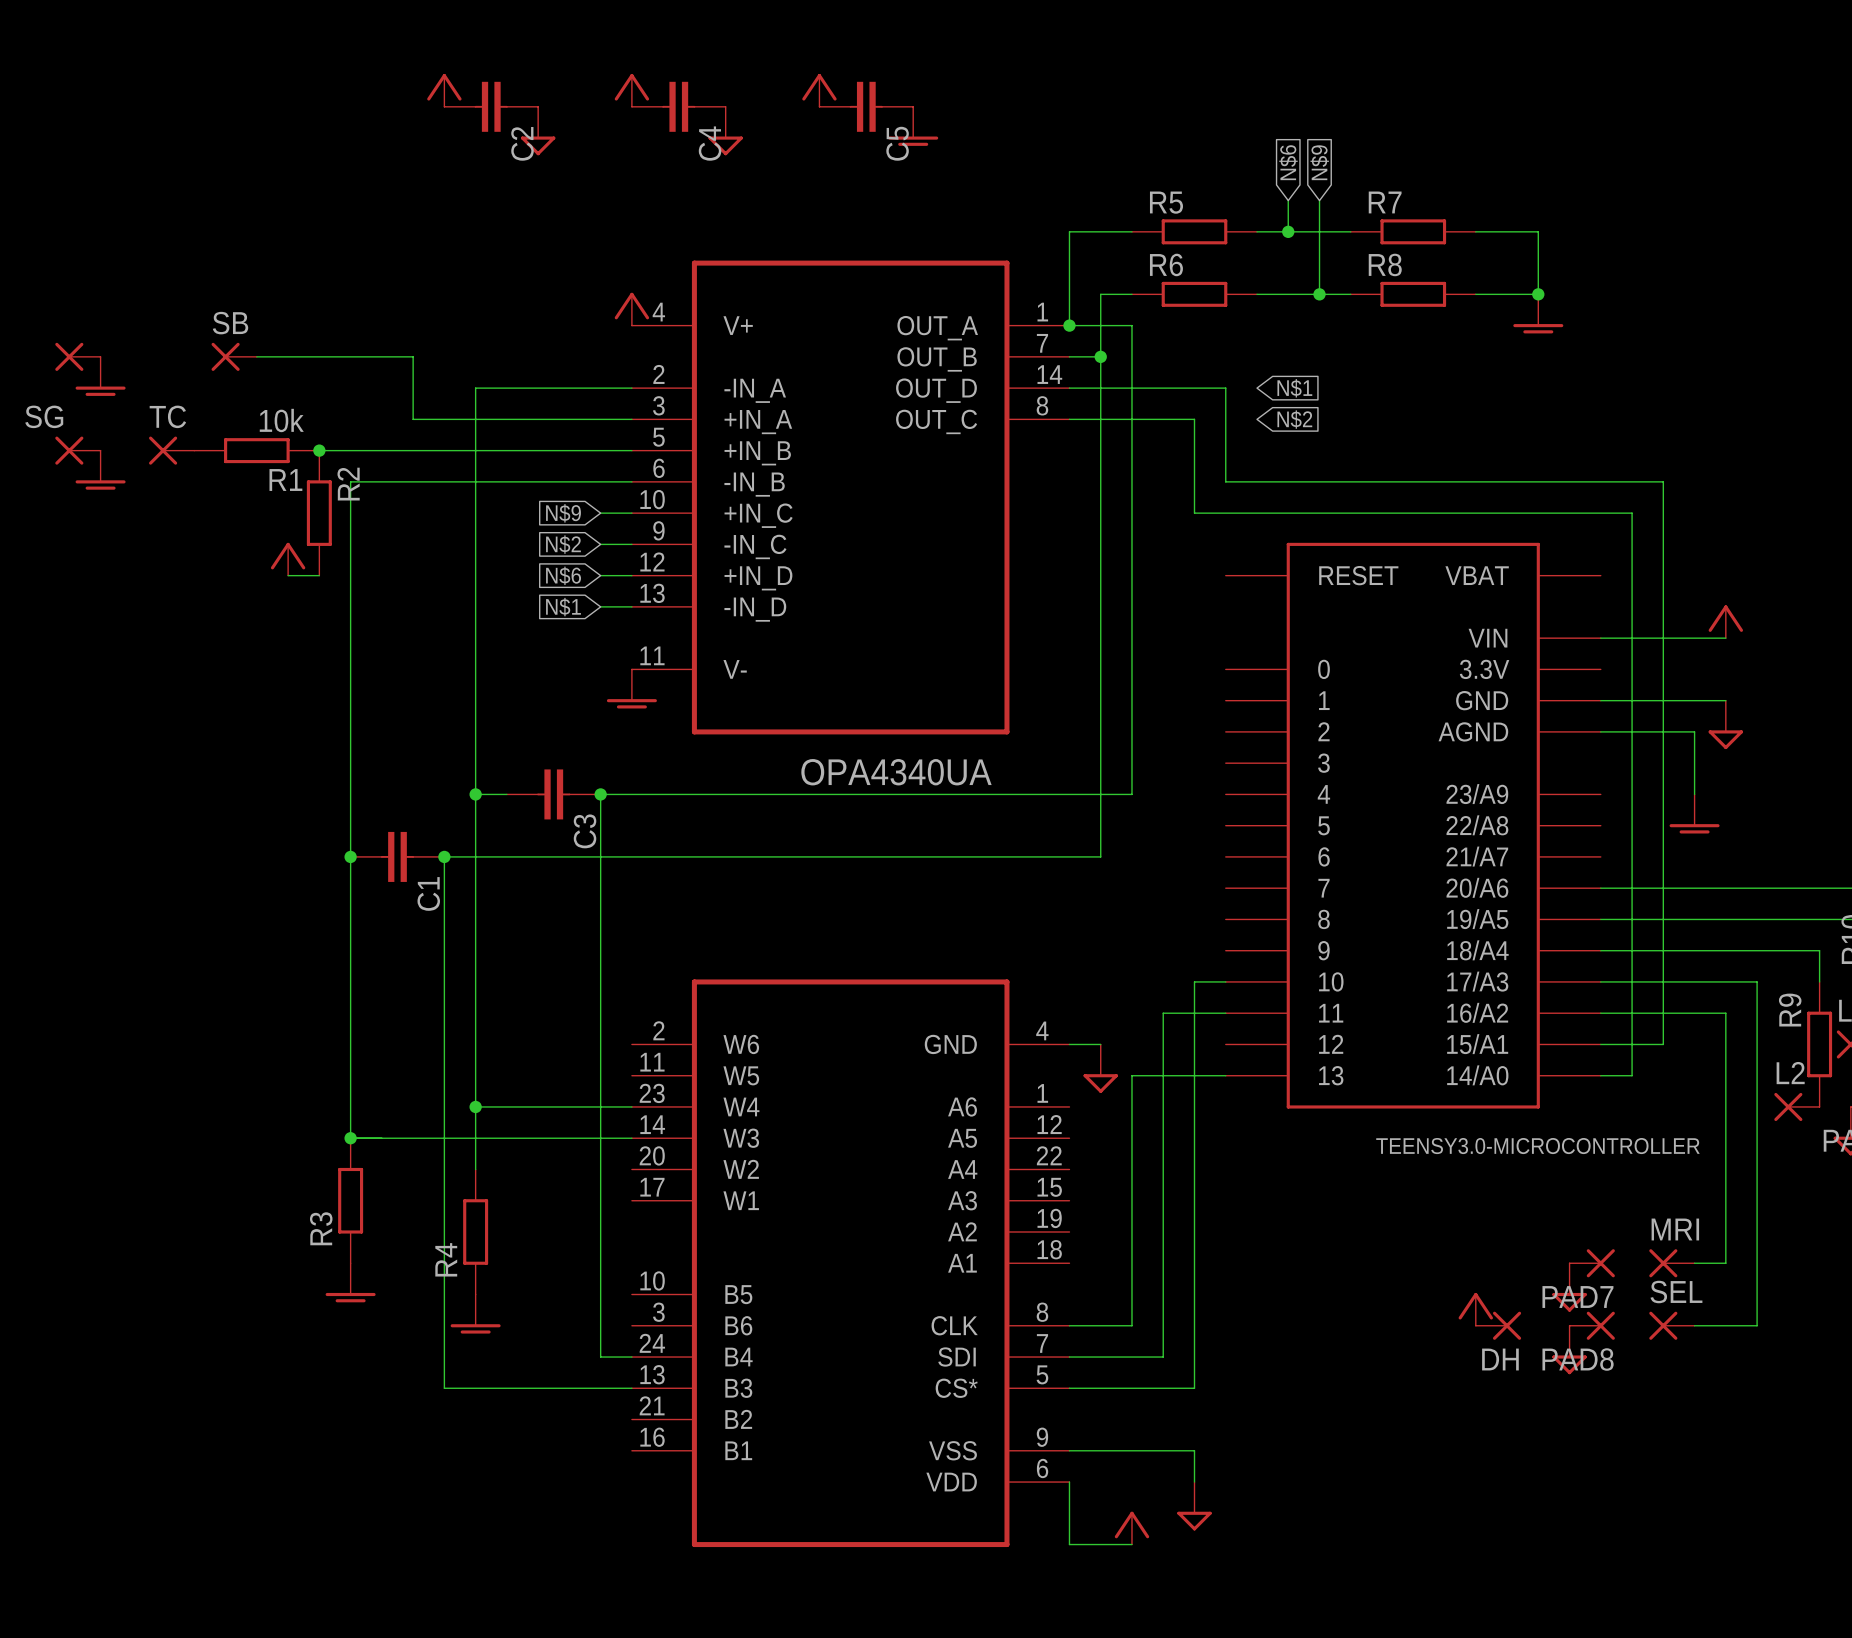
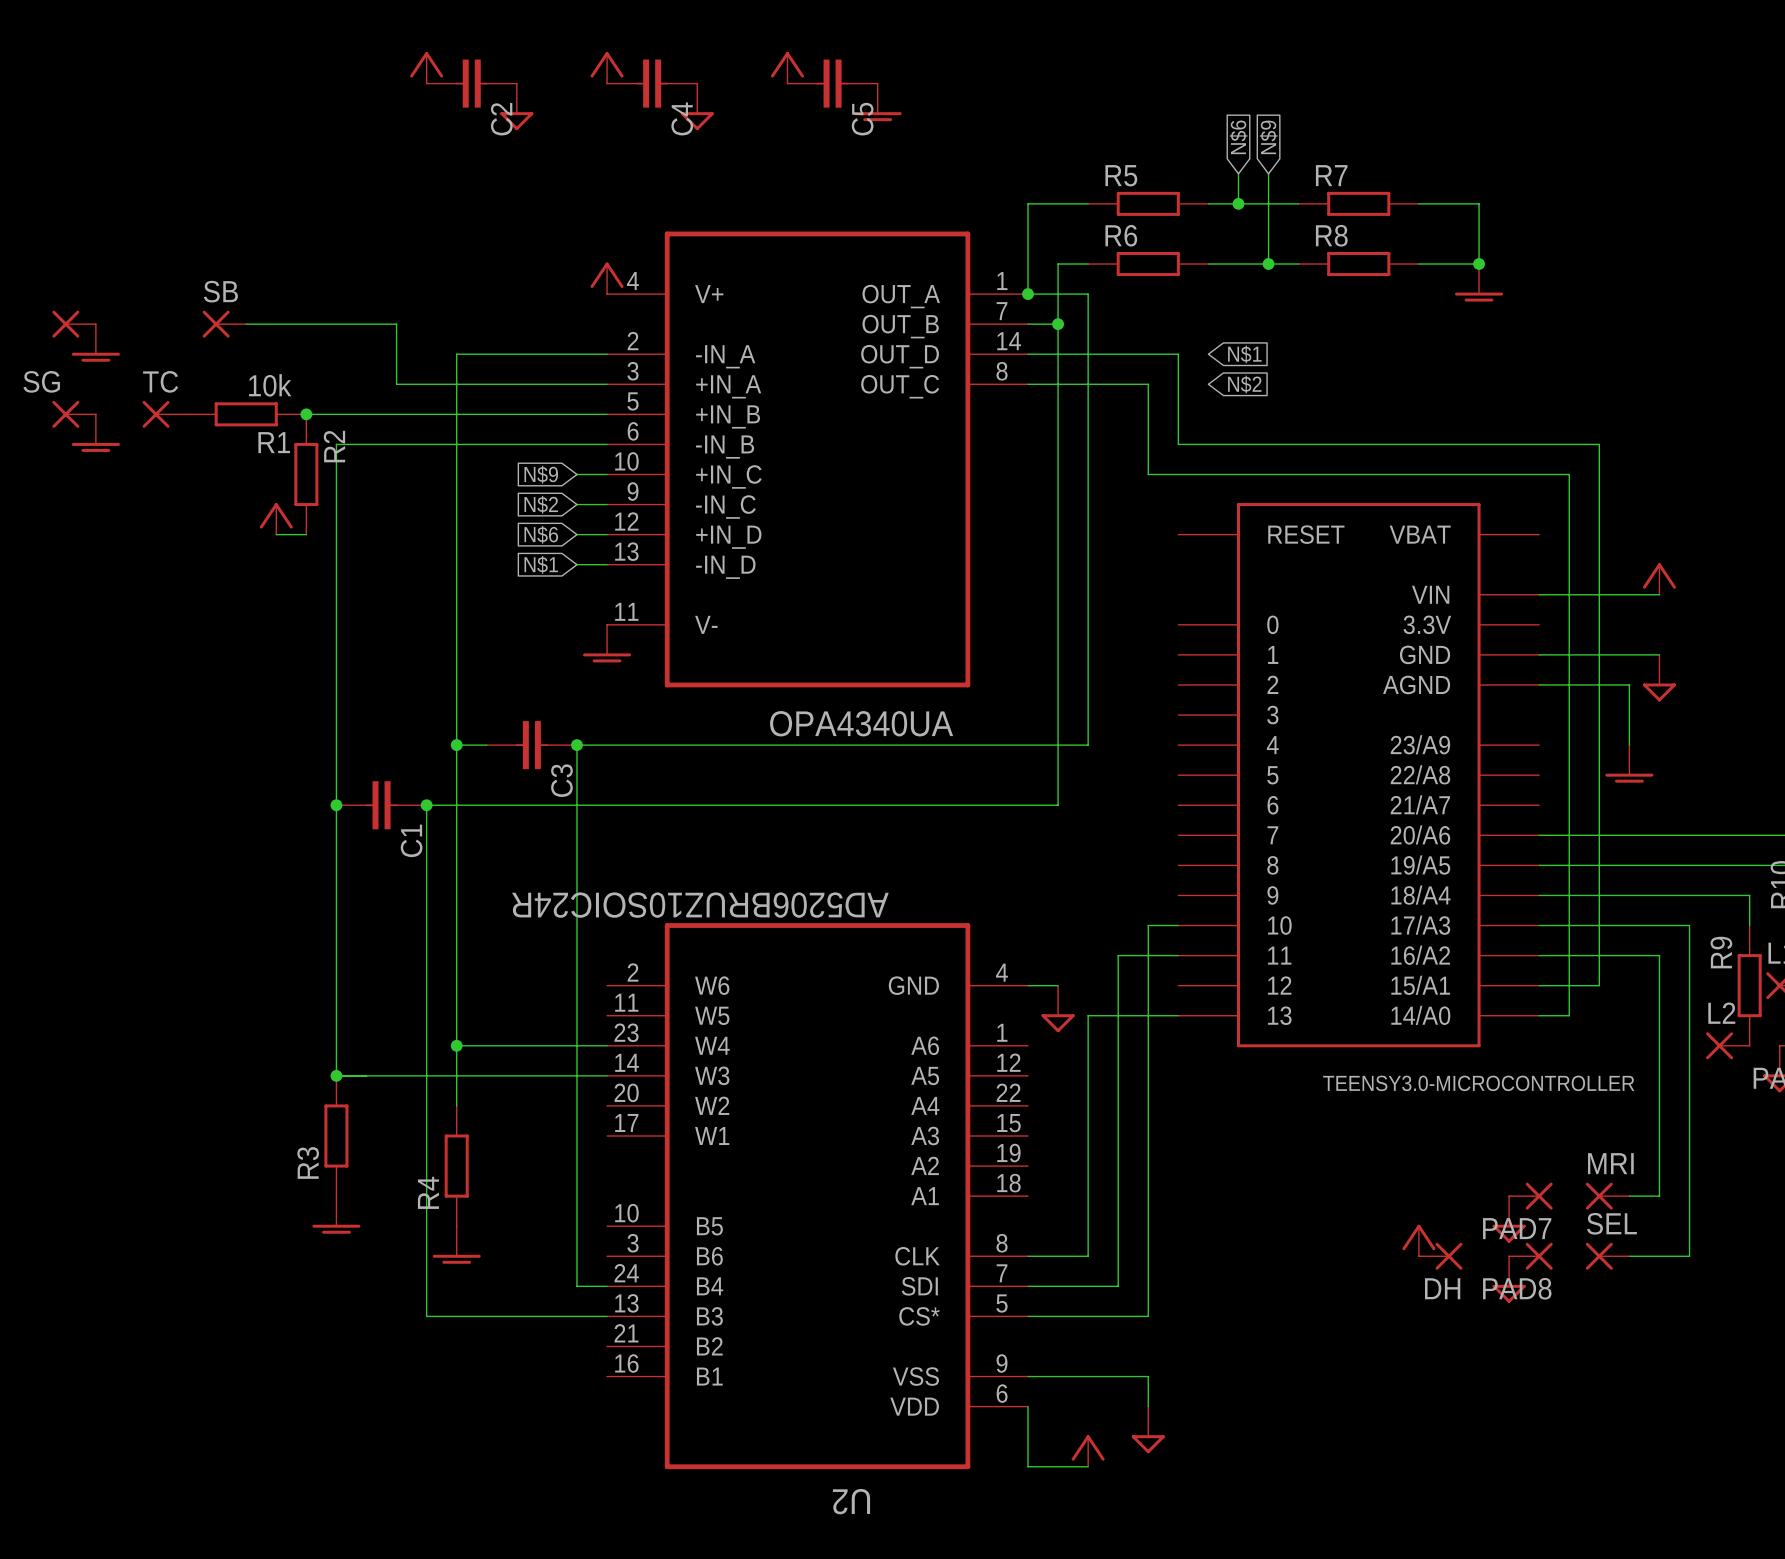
U2 value: none -> AD5206BRUZ10SOIC24R (700, 905)
U2 name: none -> U2 (851, 1501)

